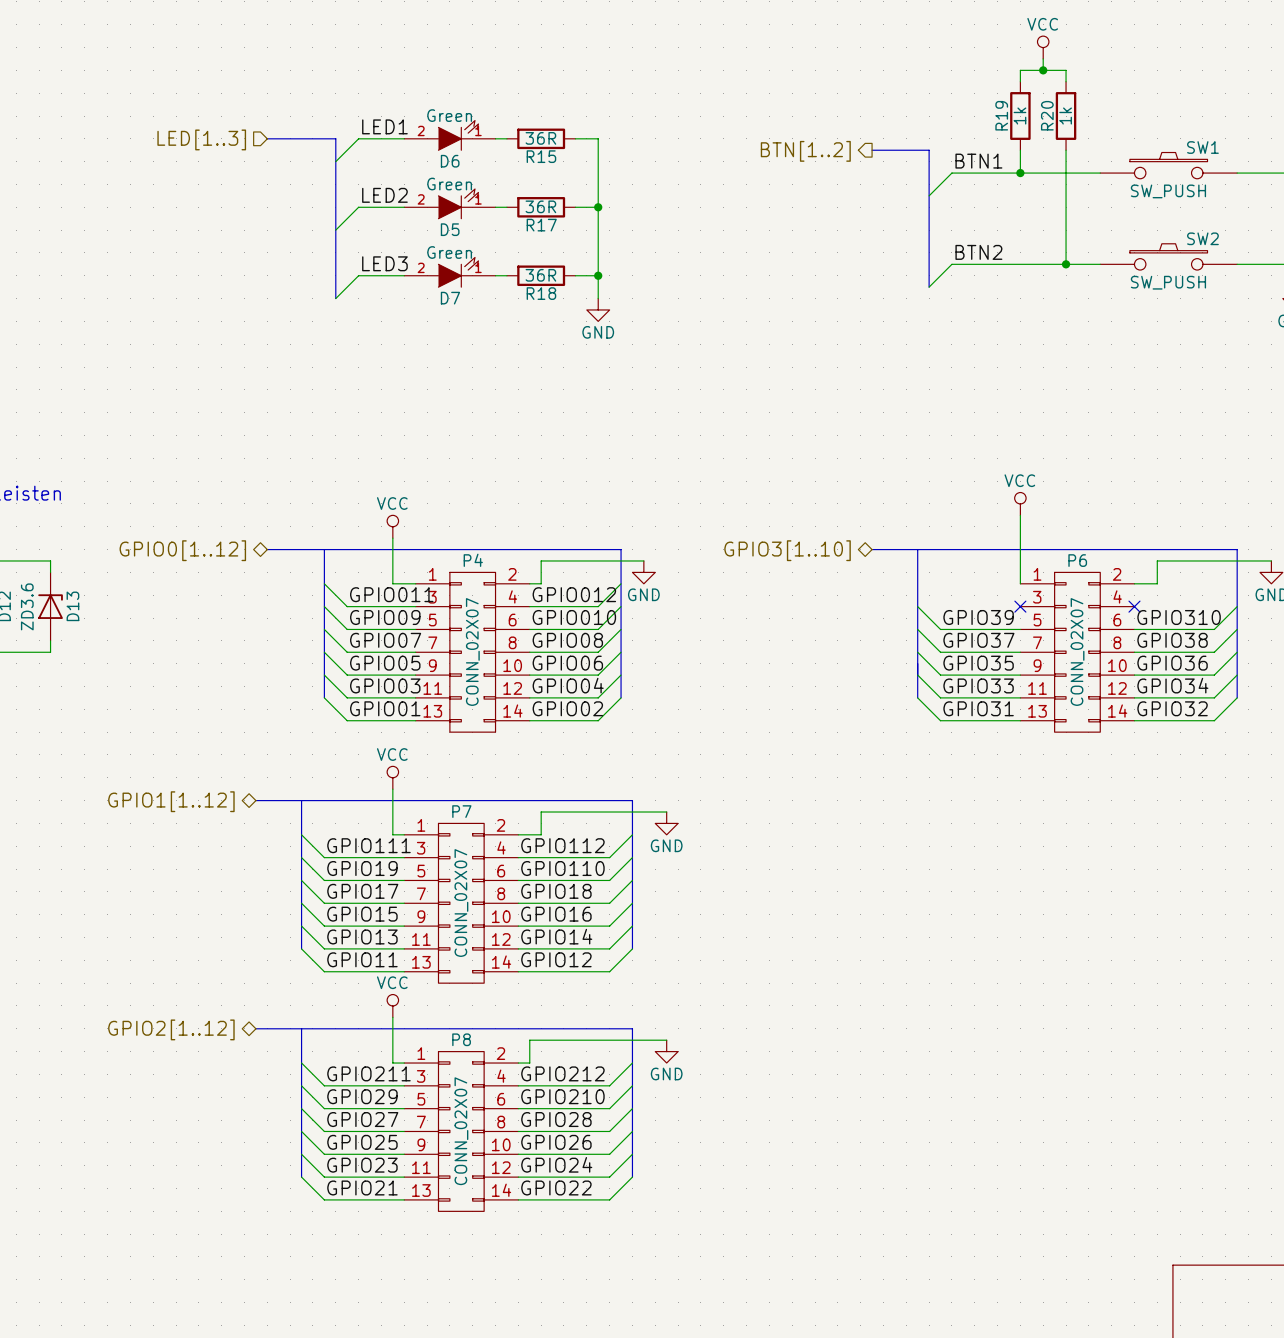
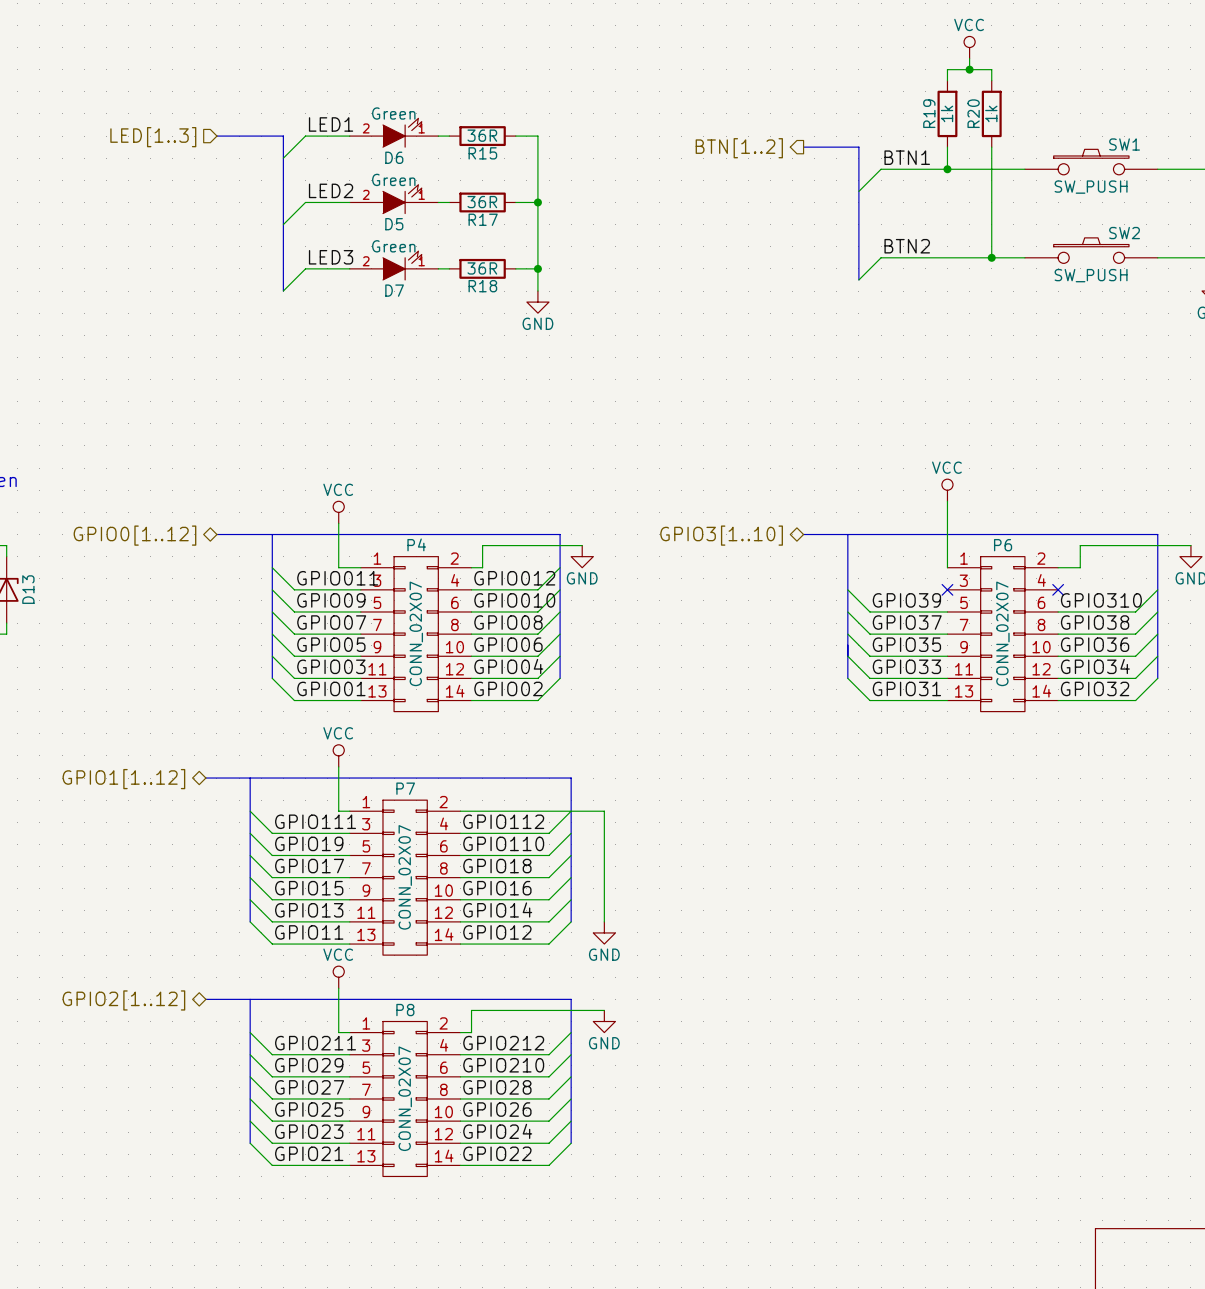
wire: (666, 812) (541, 812) (541, 834) -> (604, 921) (604, 811) (482, 811)
power symbol position: GND (666, 823) -> GND (604, 932)

